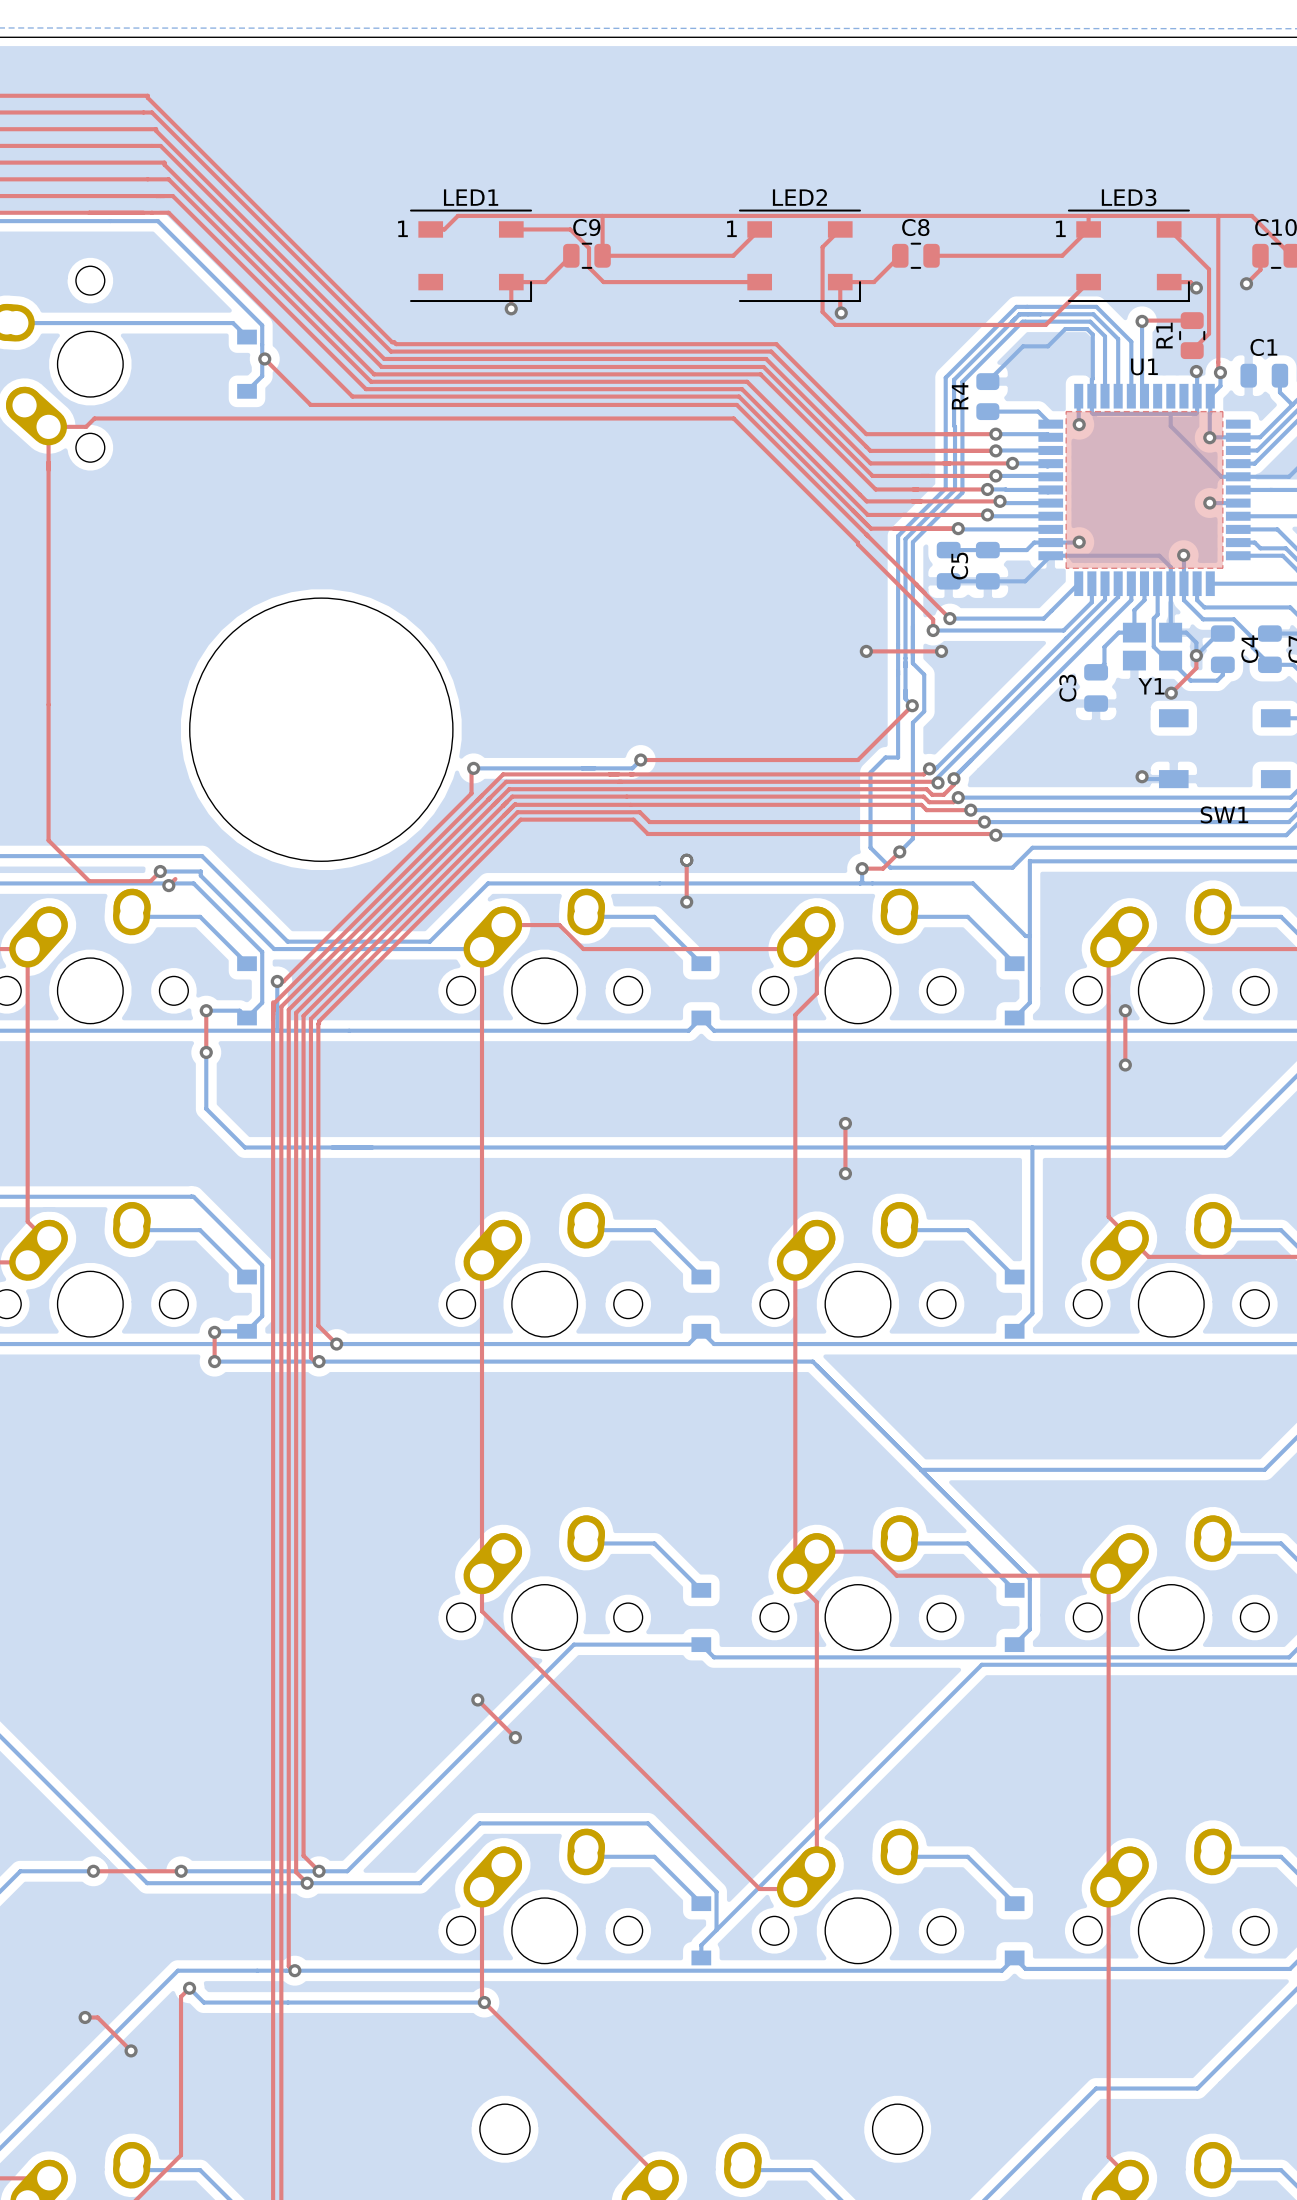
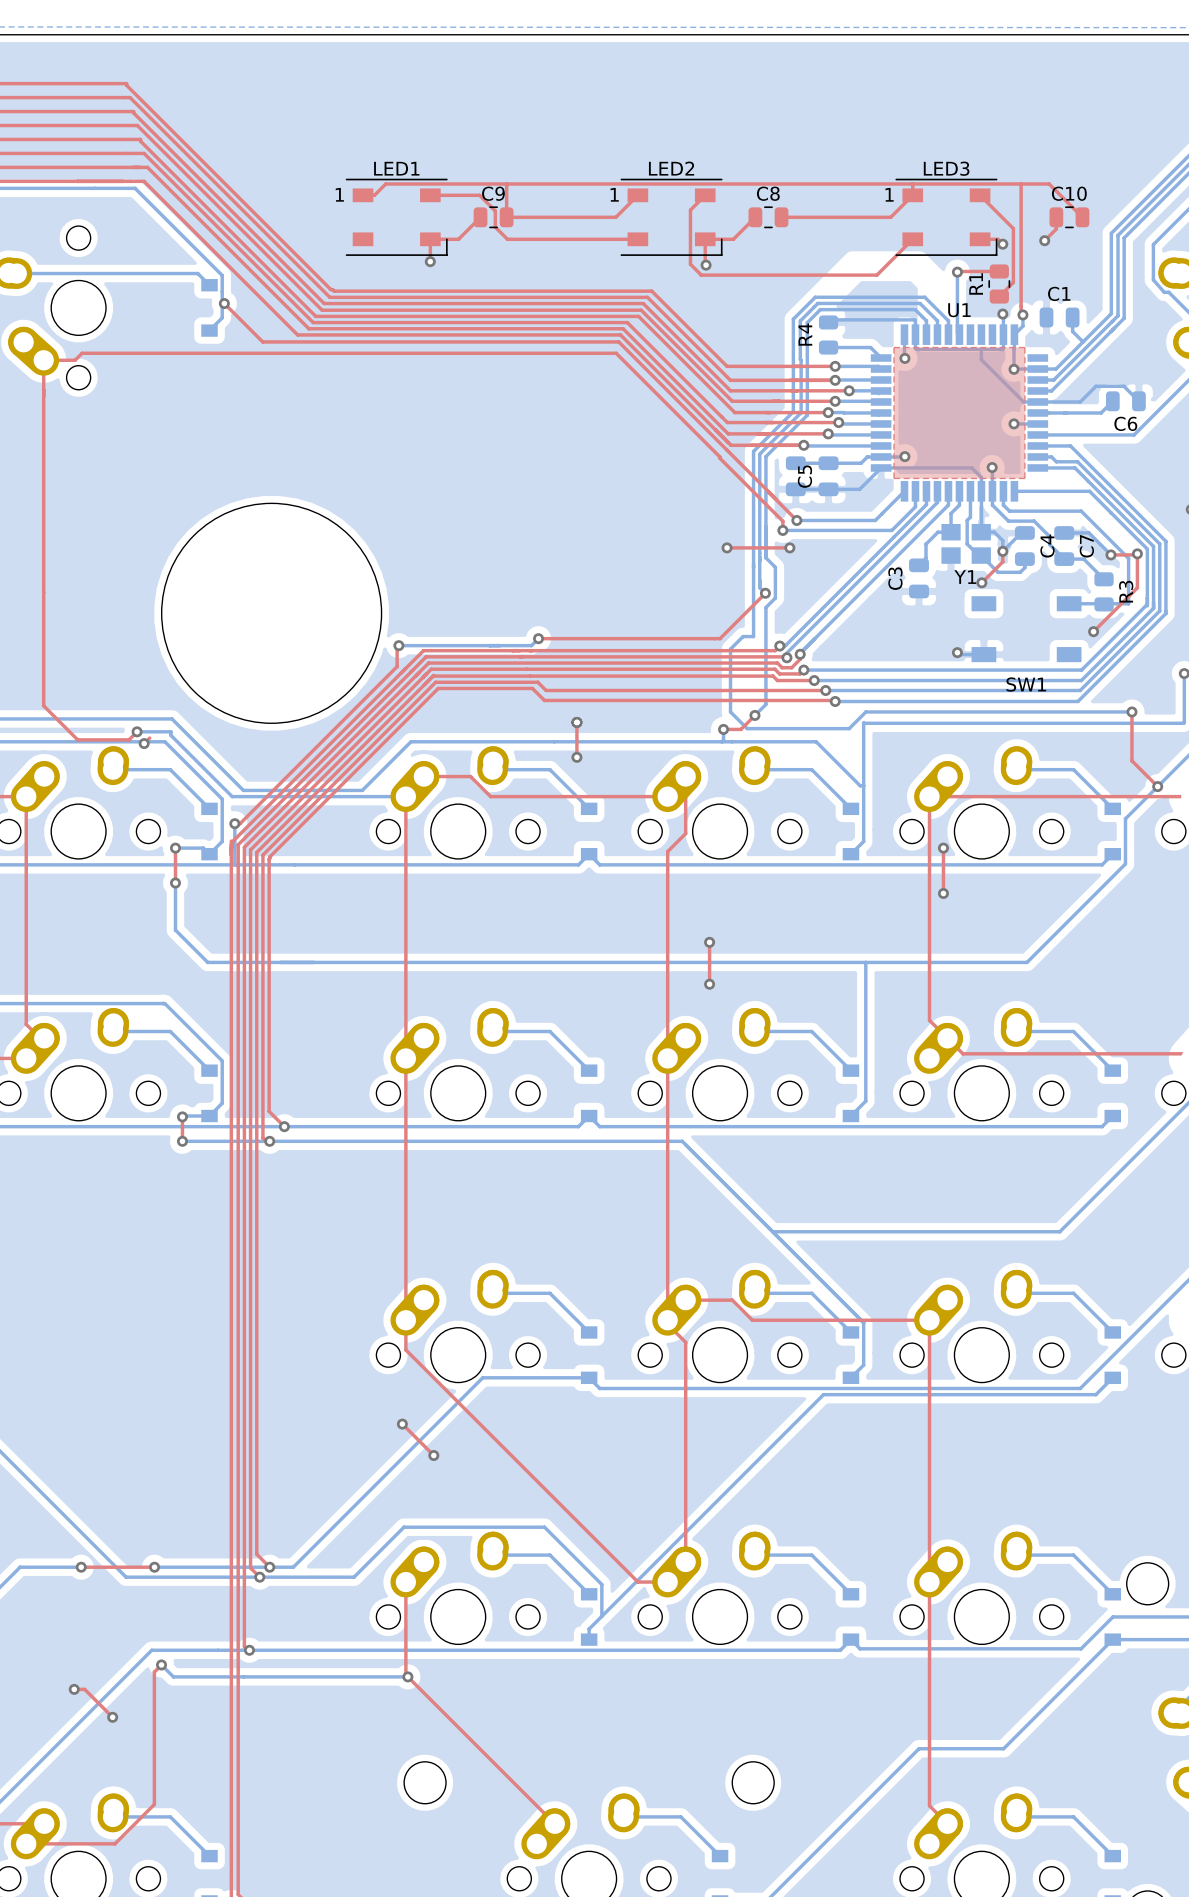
bottom track: (971, 351) (1016, 306) (1096, 306) (1131, 341) (1131, 379) -> (815, 297) (924, 297) (948, 320)
bottom track: (975, 358) (1019, 314) (1093, 314) (1118, 339) (1118, 379) -> (817, 303) (920, 303) (937, 320)
bottom track: (978, 366) (1022, 321) (1090, 321) (1105, 336) (1105, 379) -> (820, 309) (915, 309) (926, 320)
bottom track: (990, 378) (1023, 346) (1047, 346) (1065, 329) (1087, 329) (1092, 334) (1091, 379) -> (831, 319) (915, 320)

